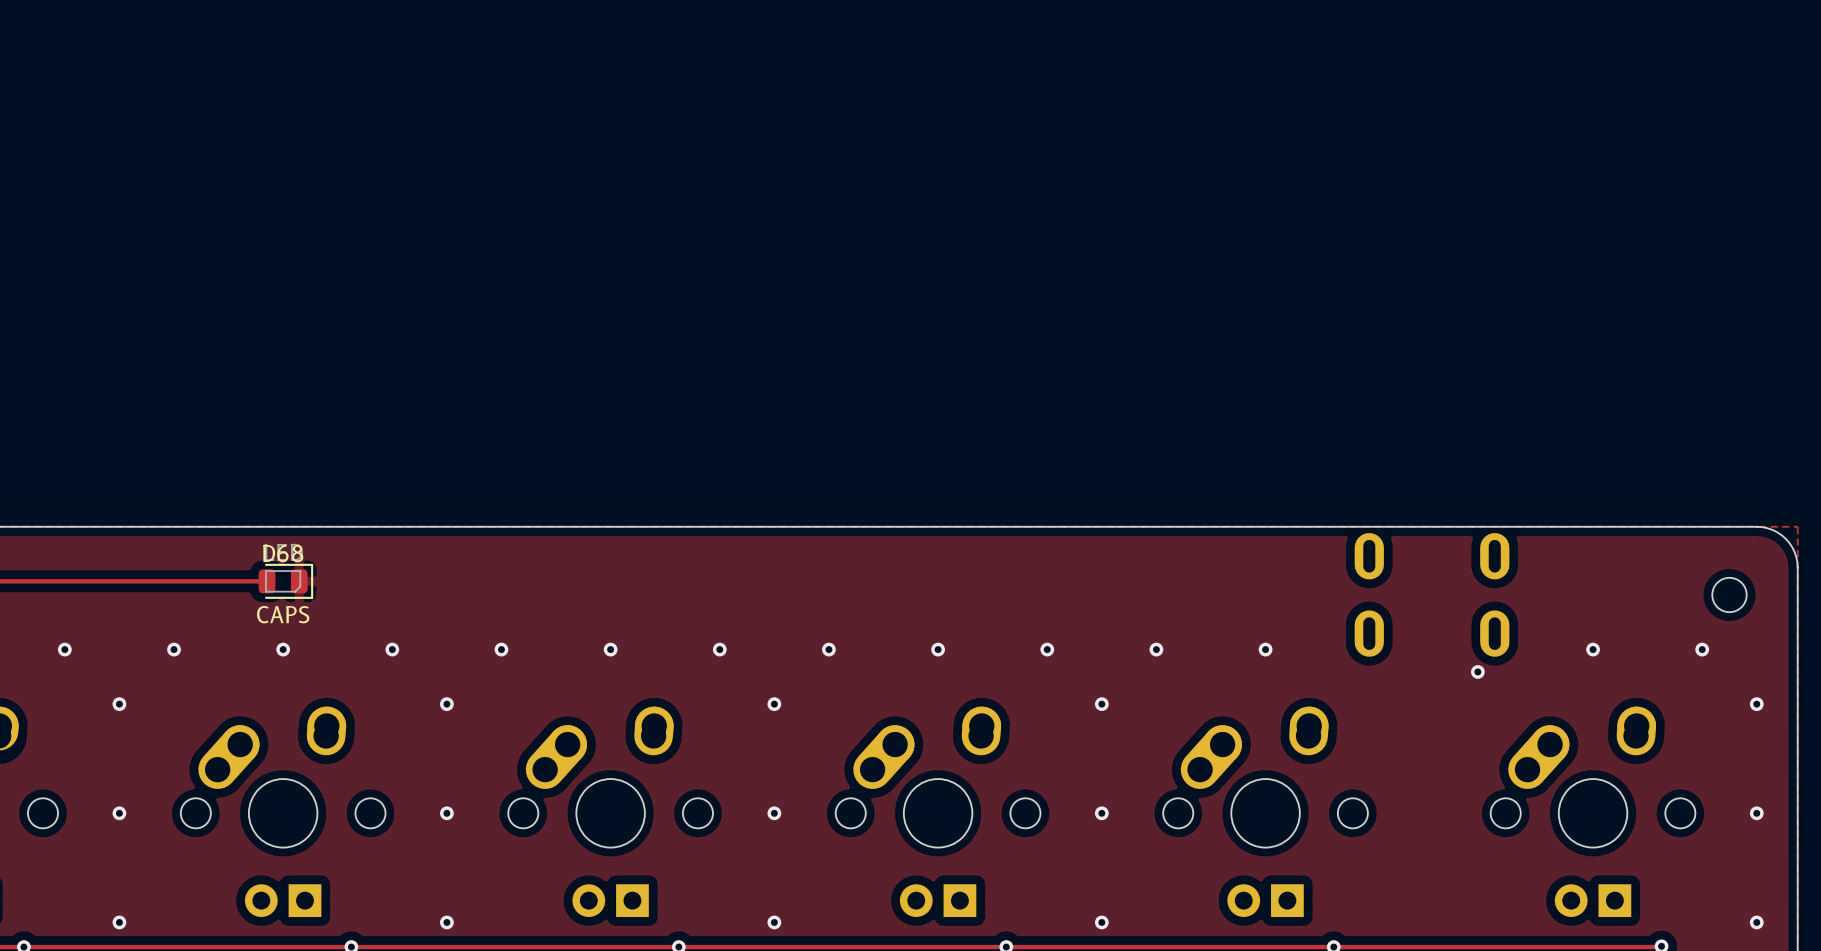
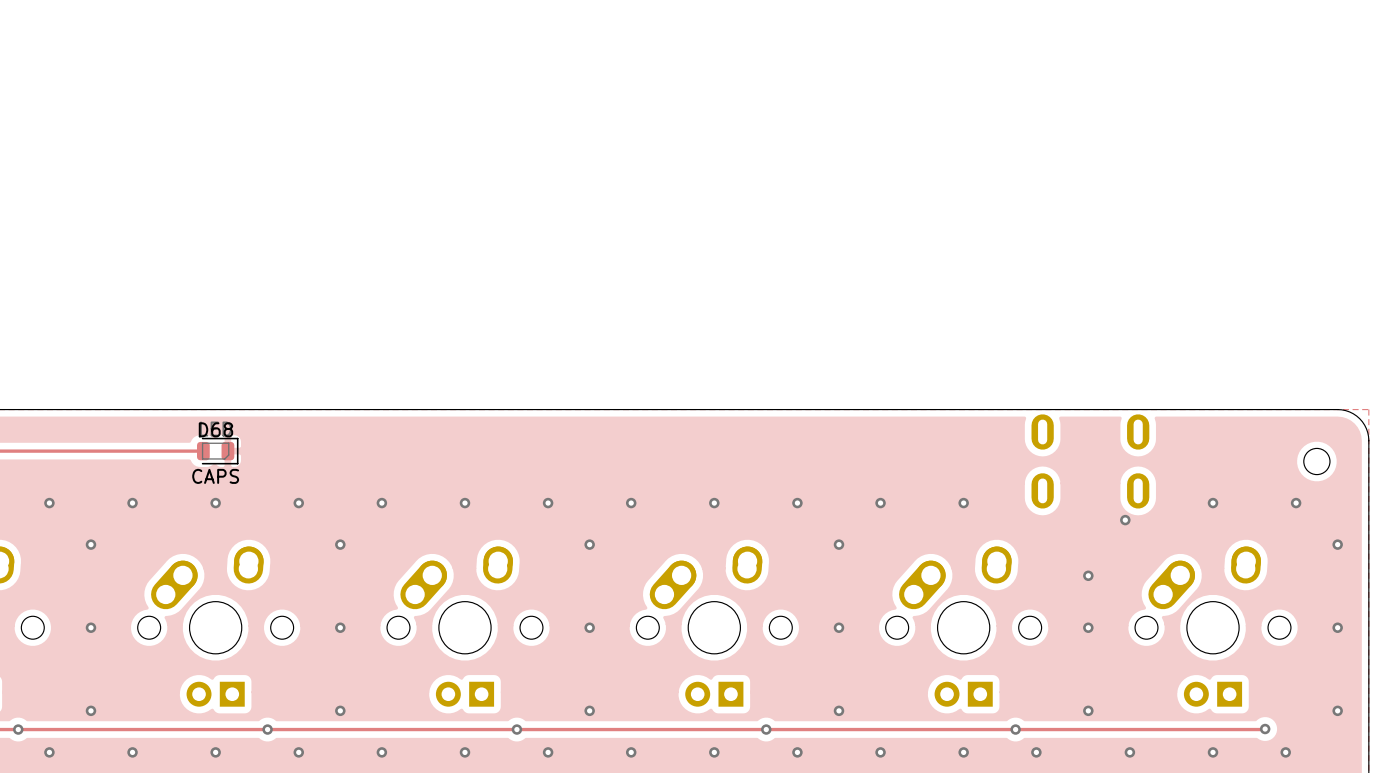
via: none -> (1088, 575)
via: none -> (1088, 627)
via: none -> (1088, 710)

